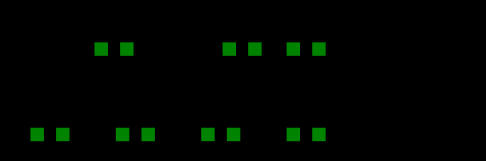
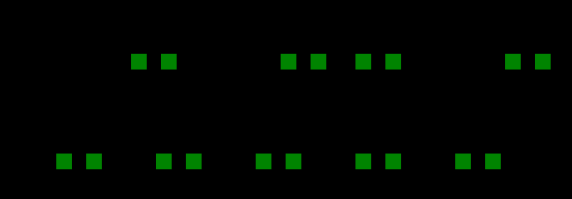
part: none -> (527, 61)
part: none -> (478, 161)

